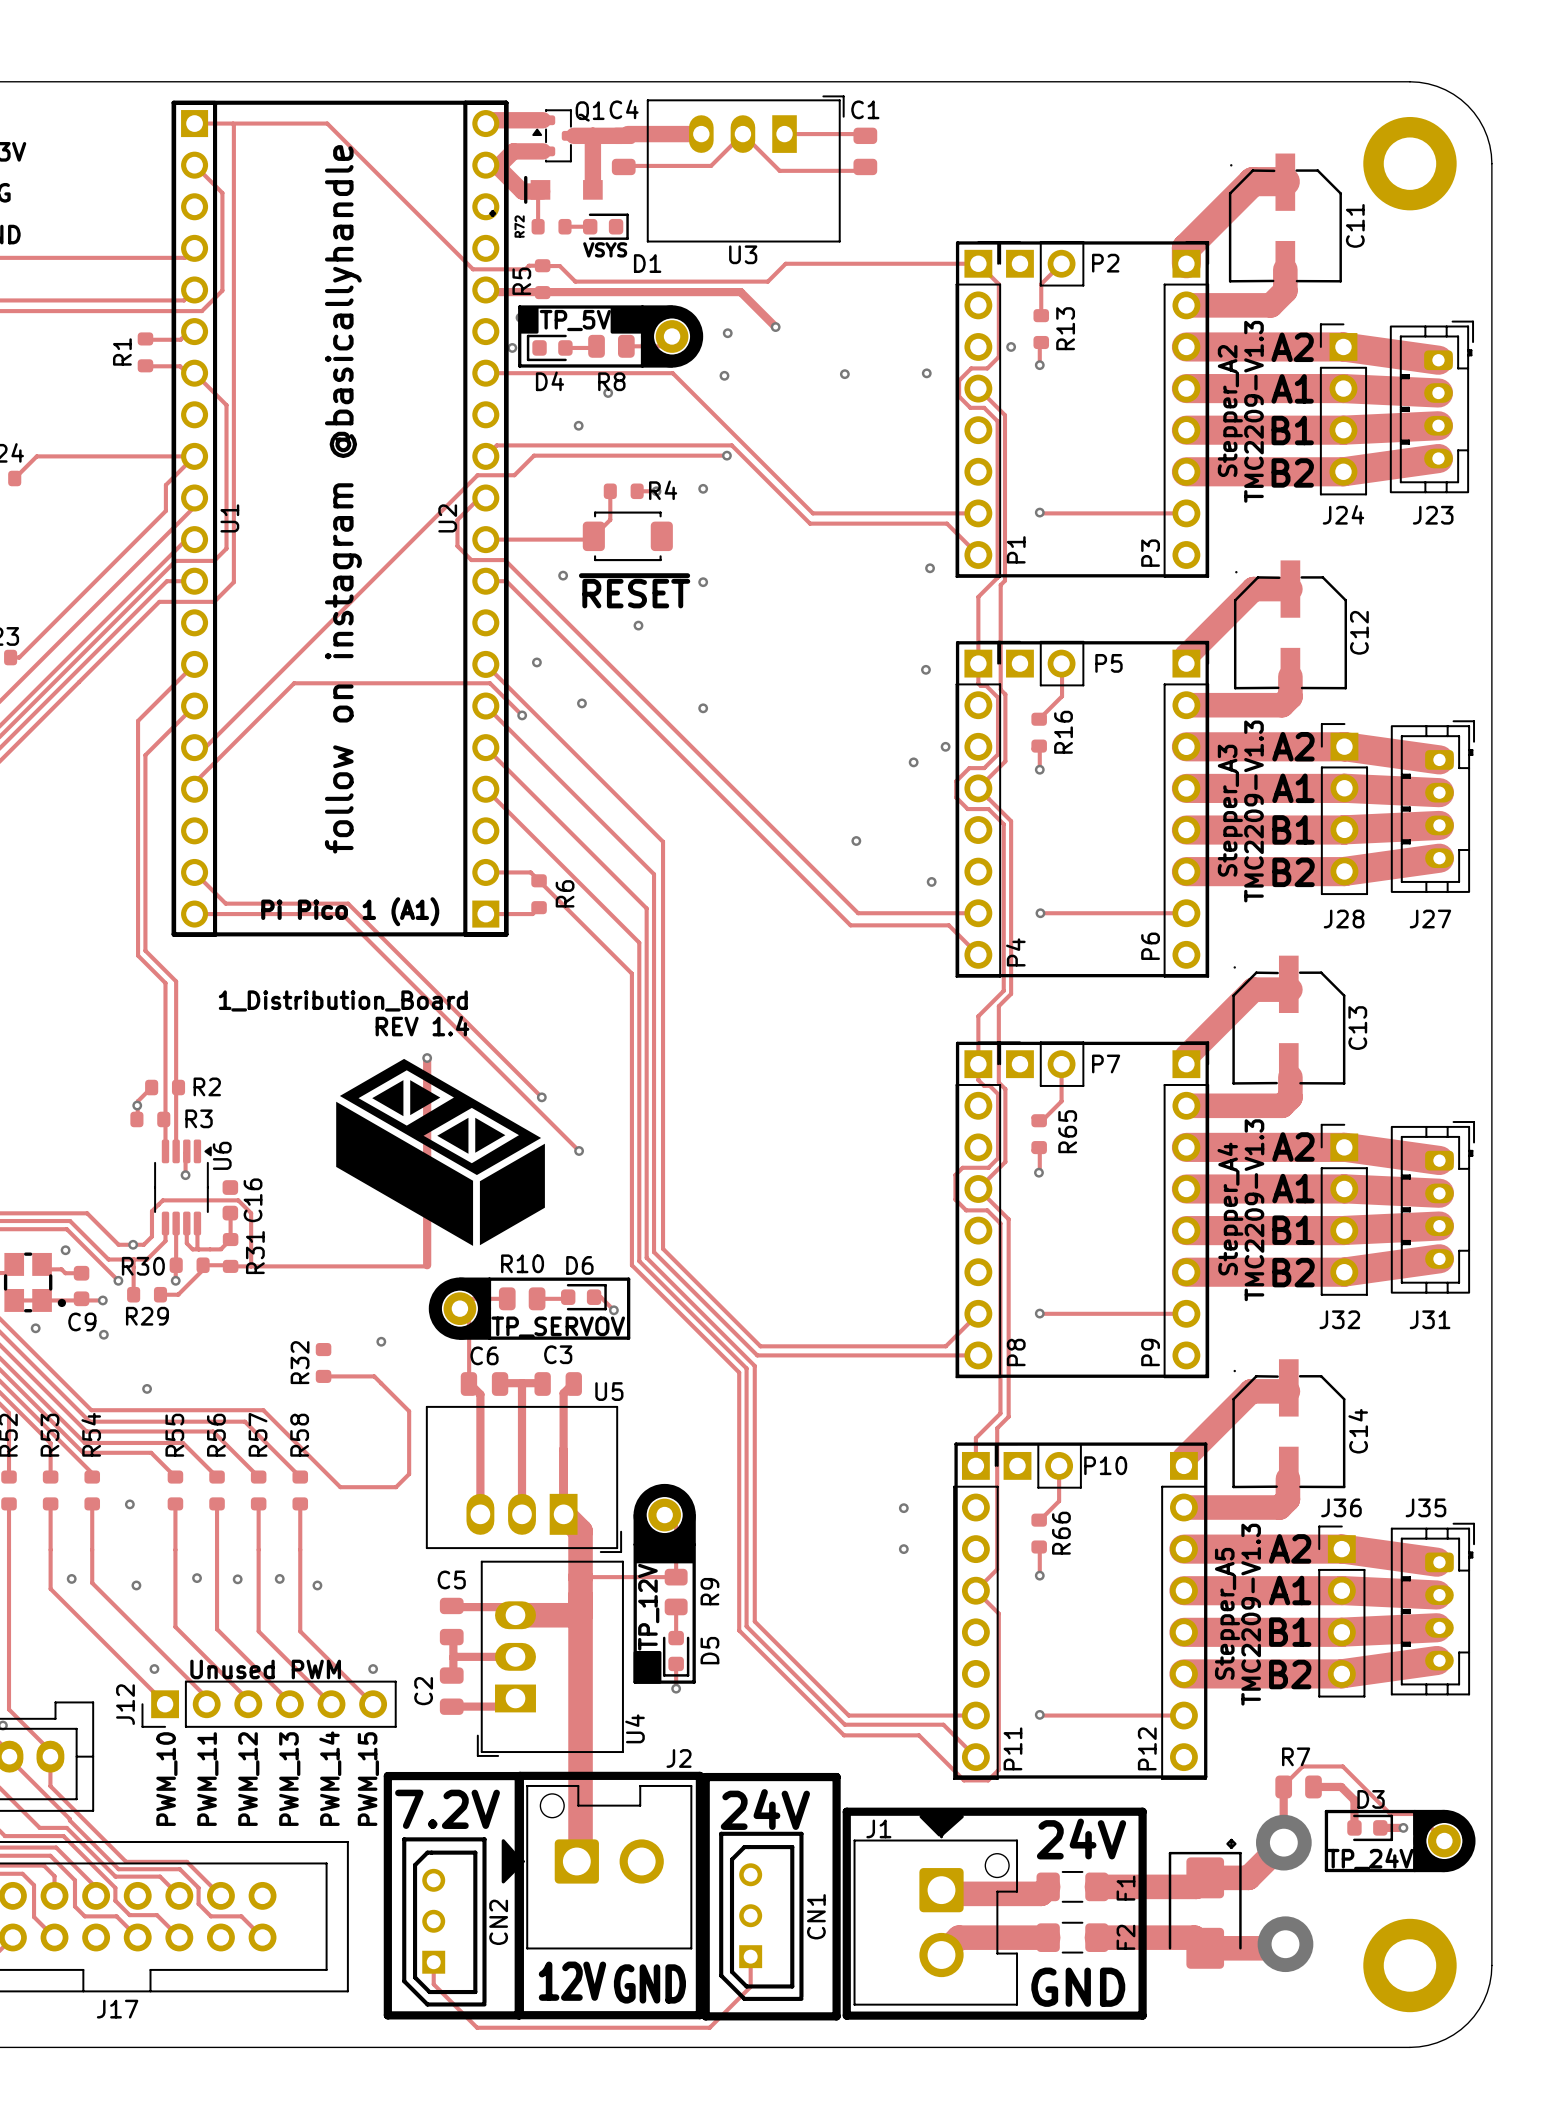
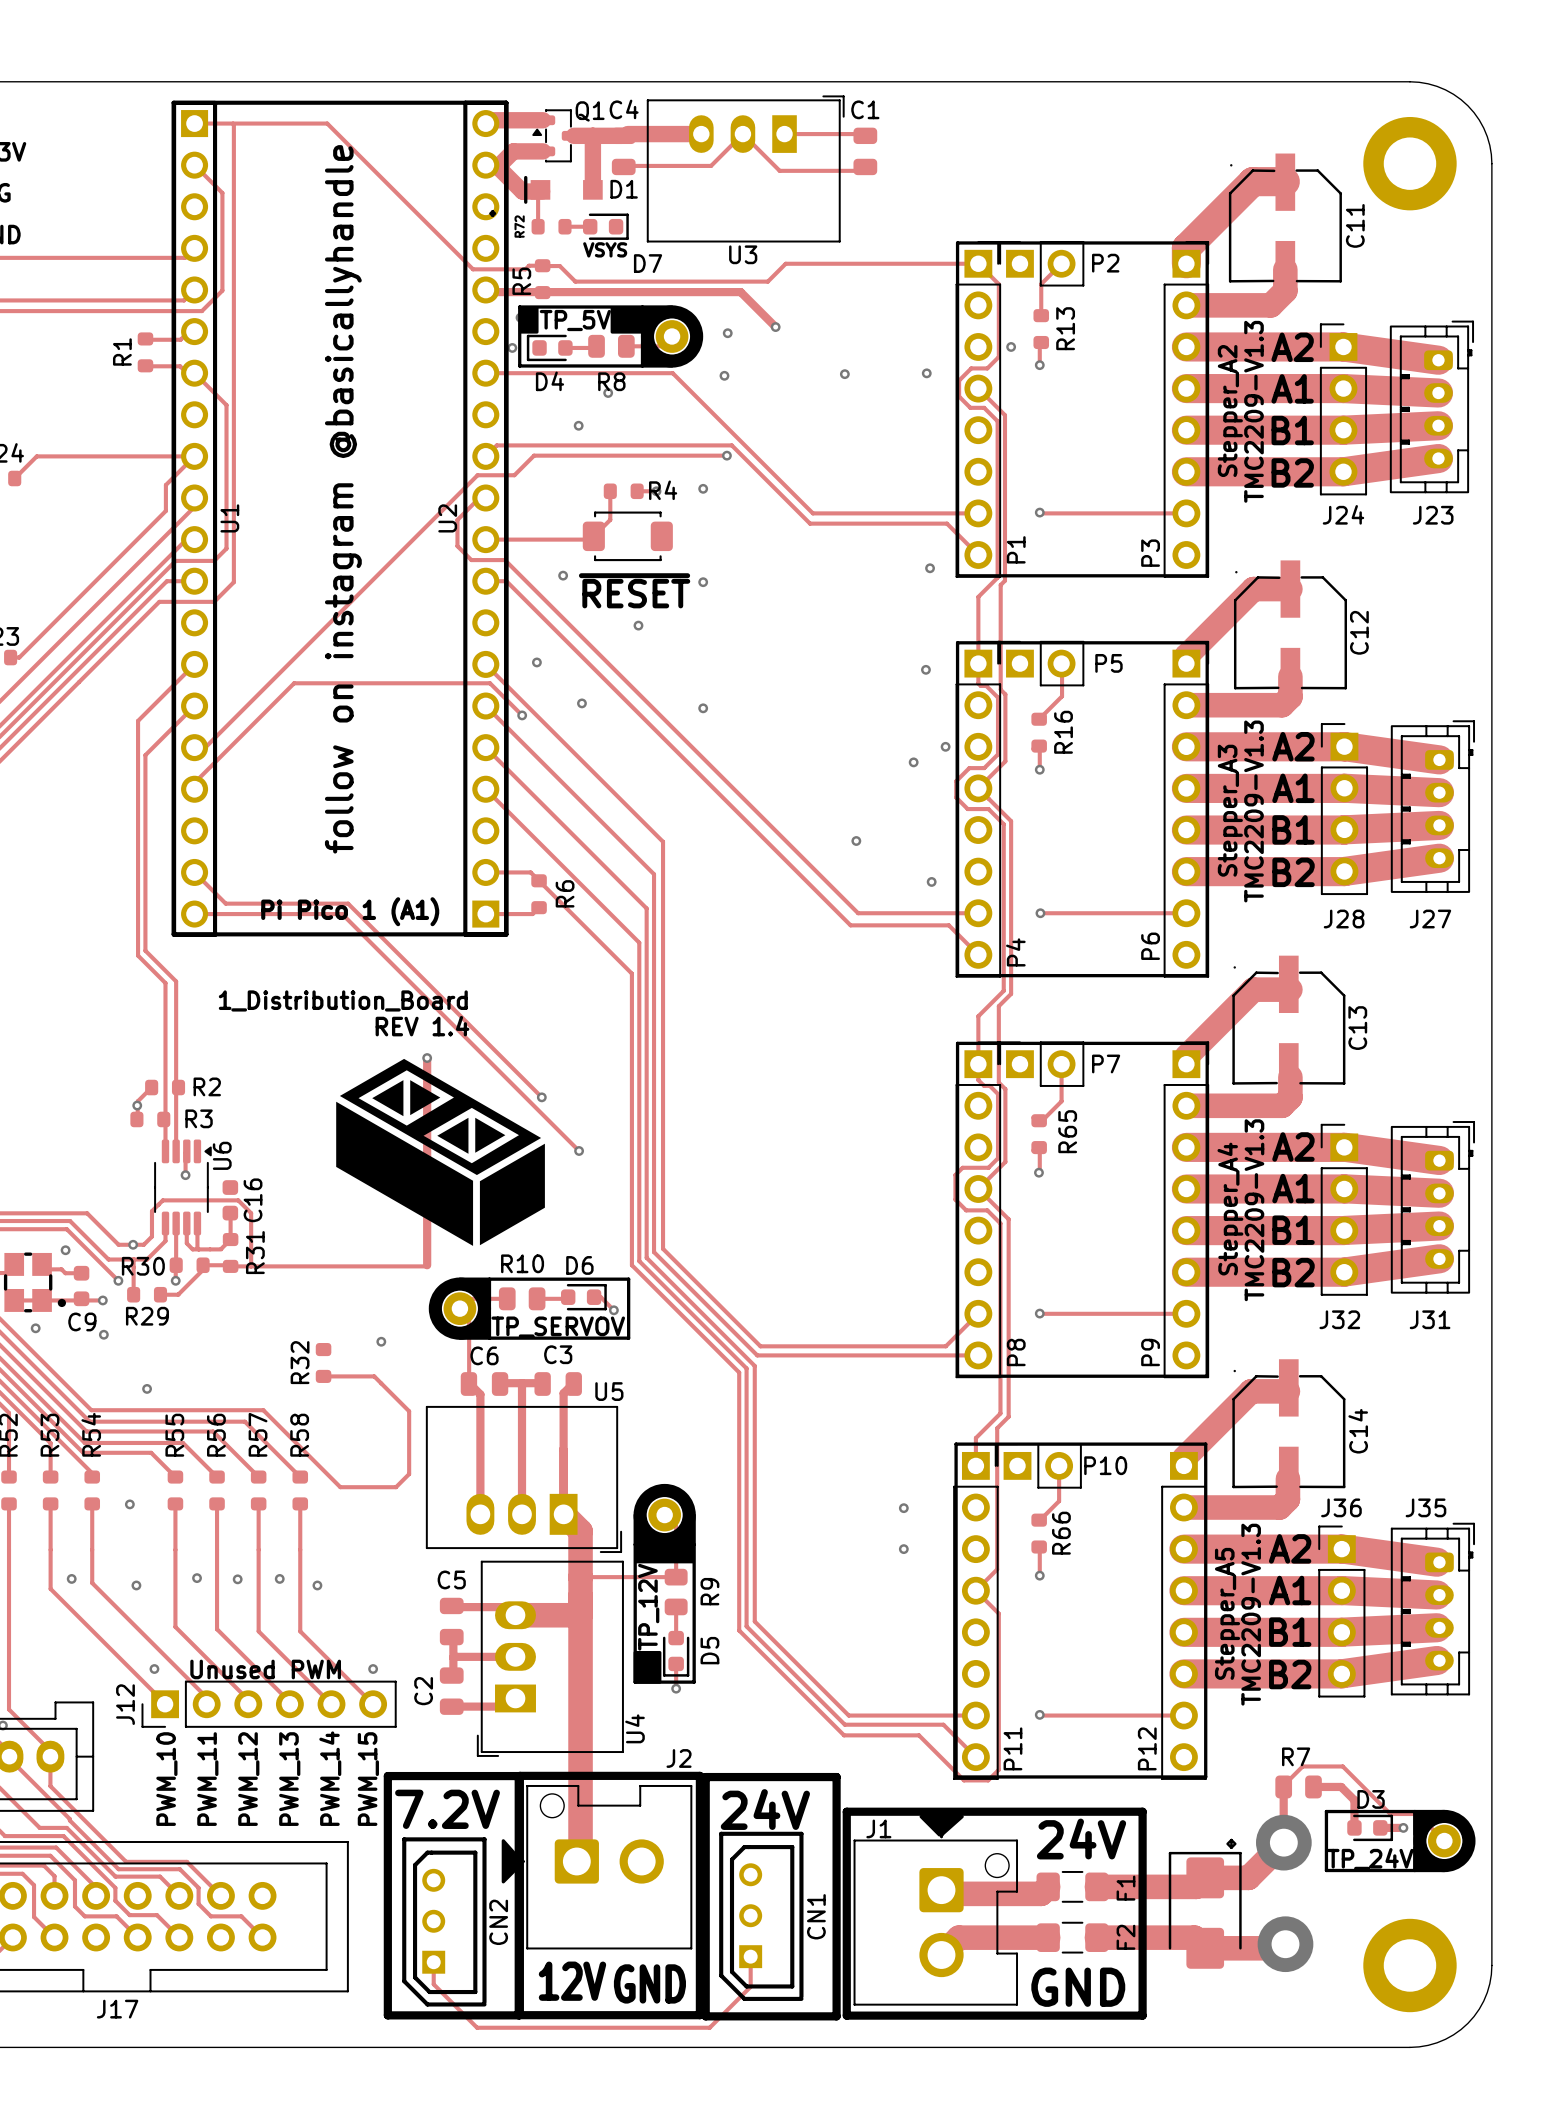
D1 name: none -> D1 (624, 189)
text: D1 (647, 263) -> none
D7 name: none -> D7 (648, 263)

